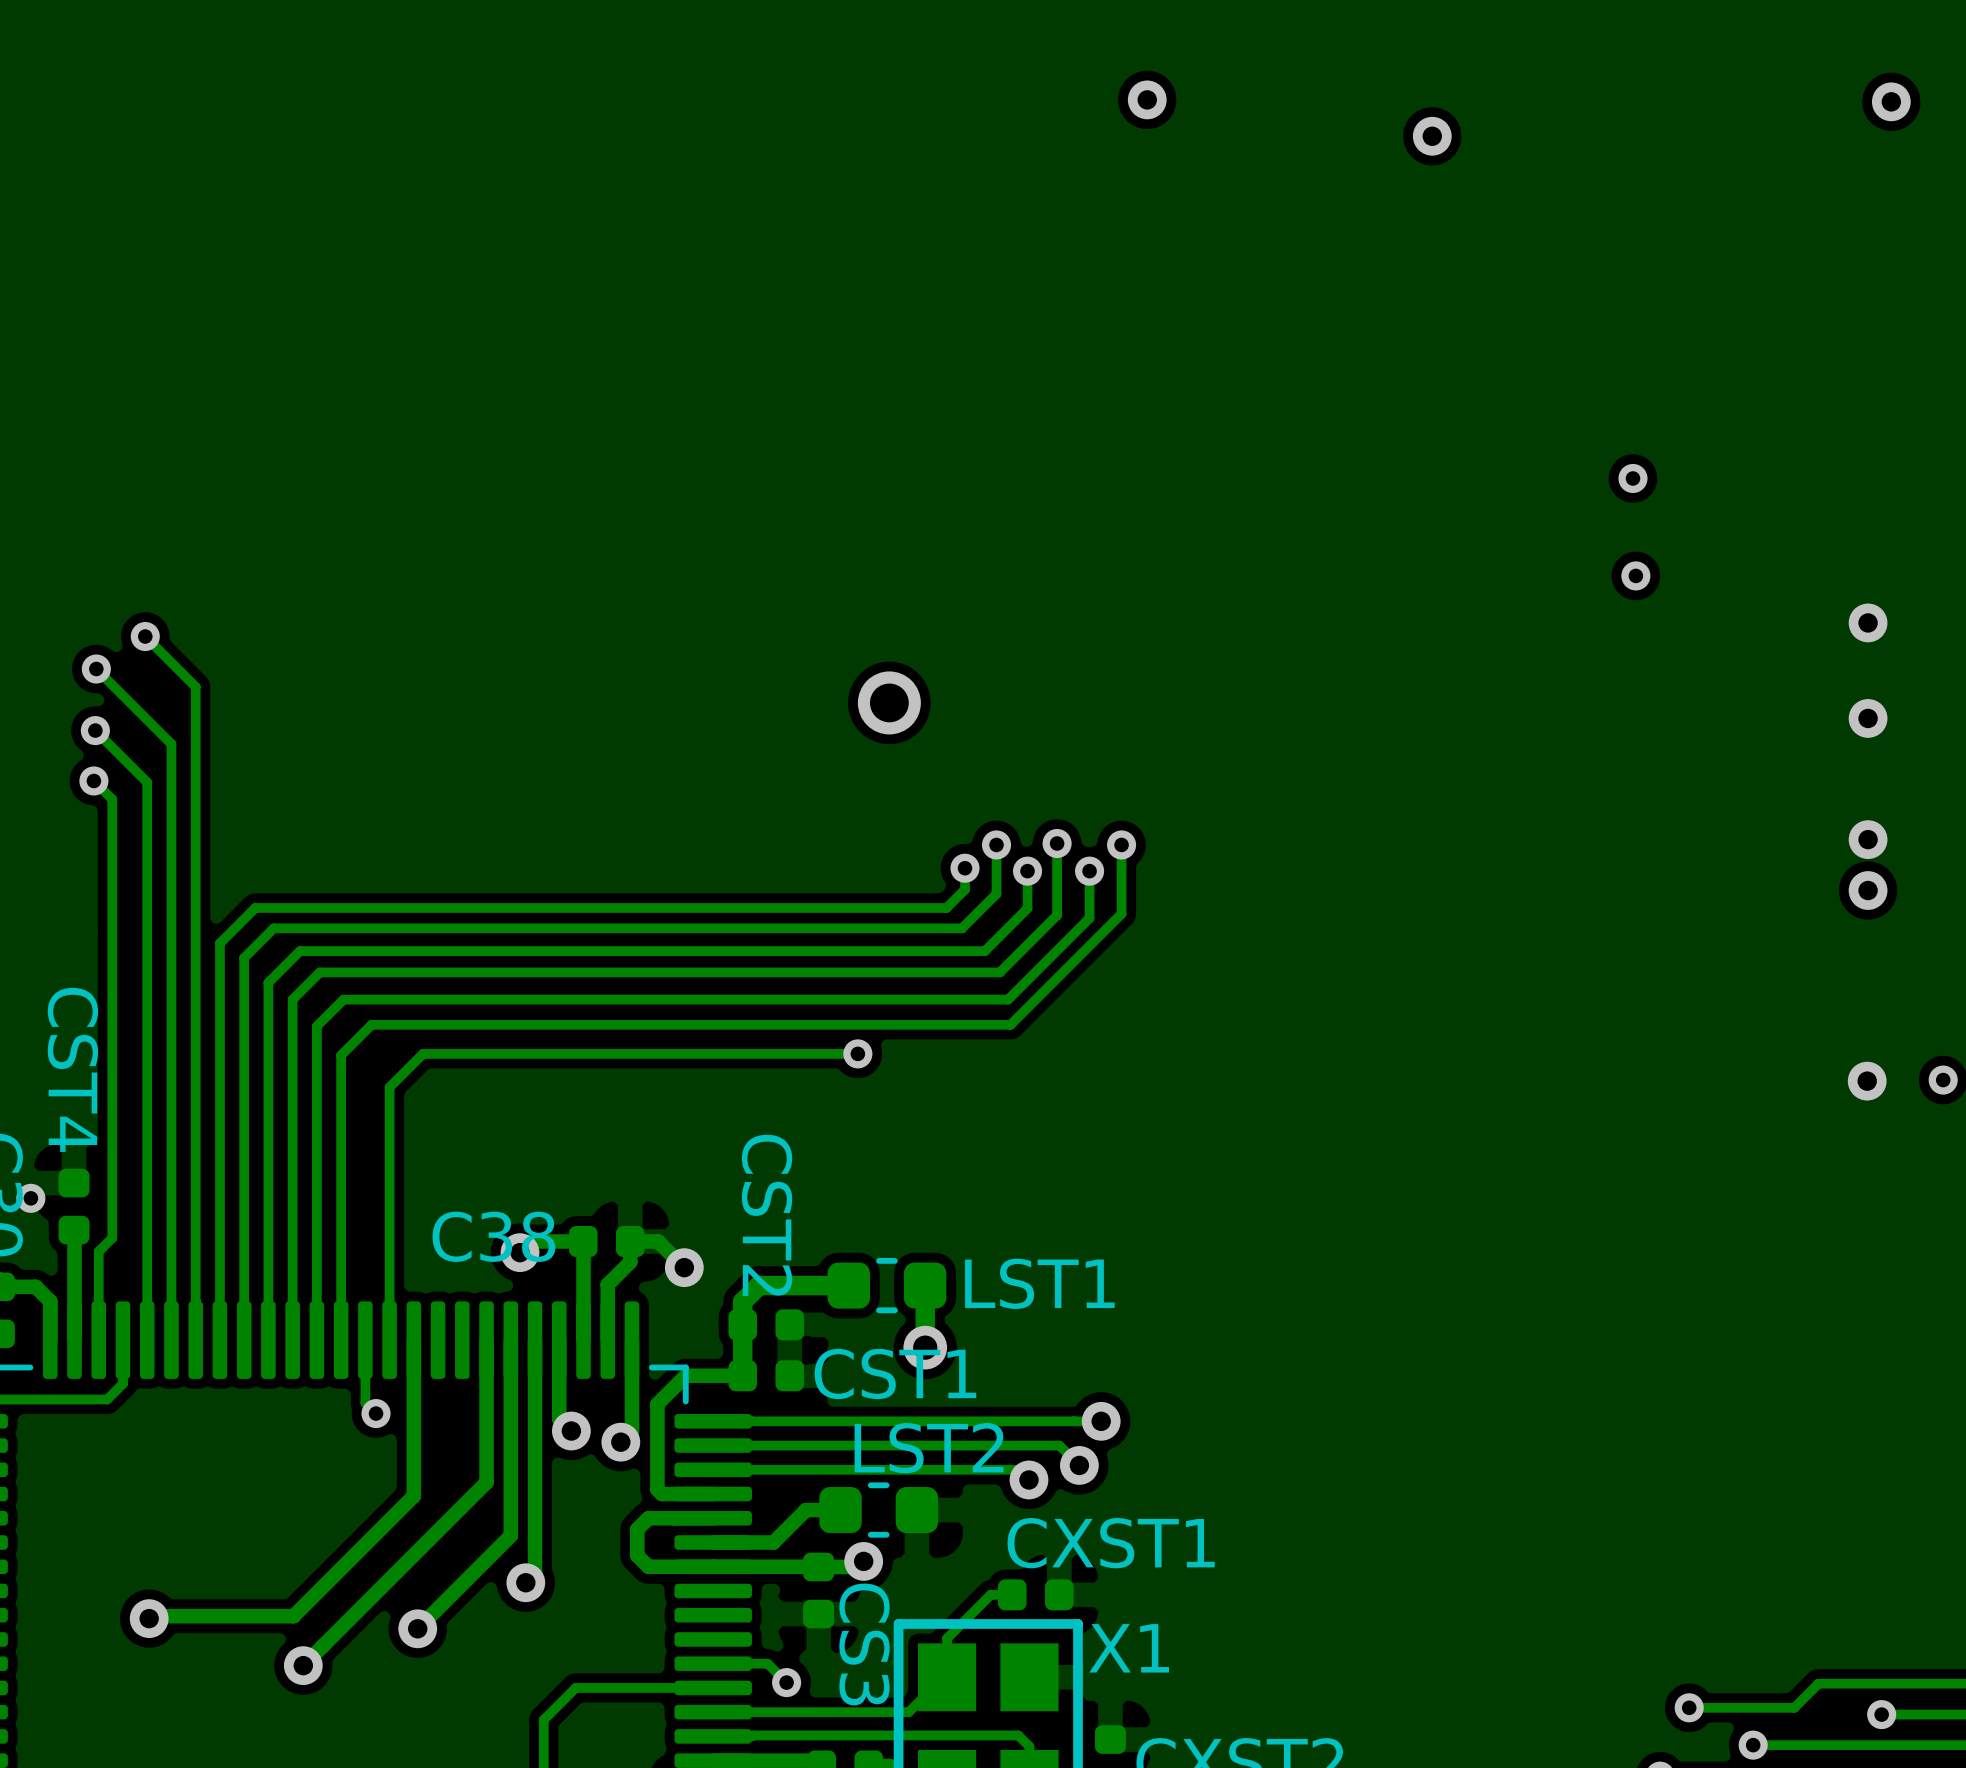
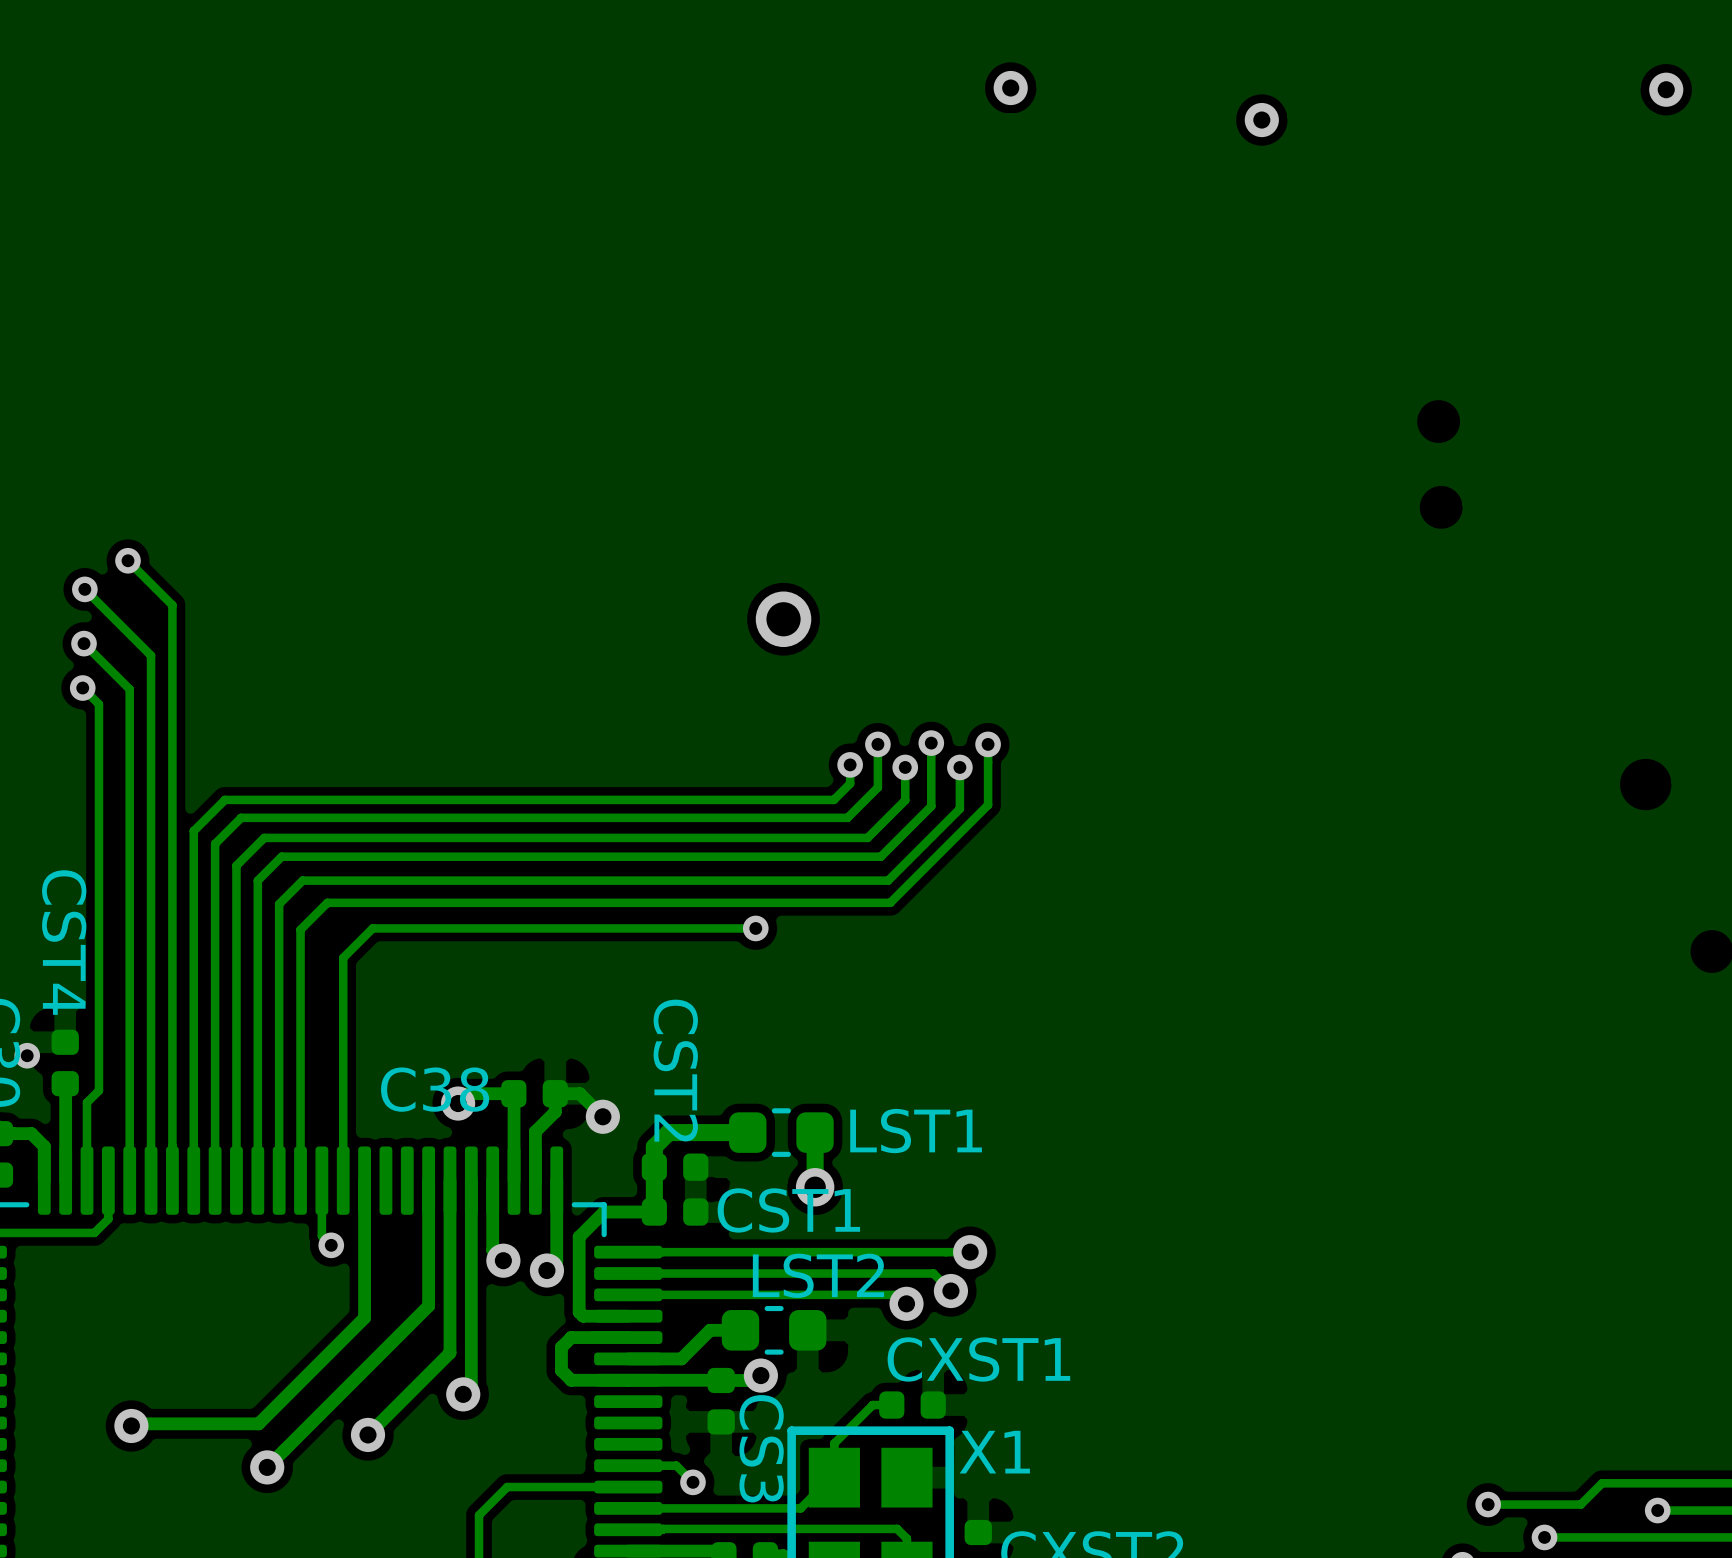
via: (1632, 478) -> none
via: (1635, 575) -> none
via: (1868, 622) -> none
via: (1868, 718) -> none
via: (1868, 839) -> none
via: (1868, 890) -> none
via: (1943, 1080) -> none
via: (1867, 1081) -> none

